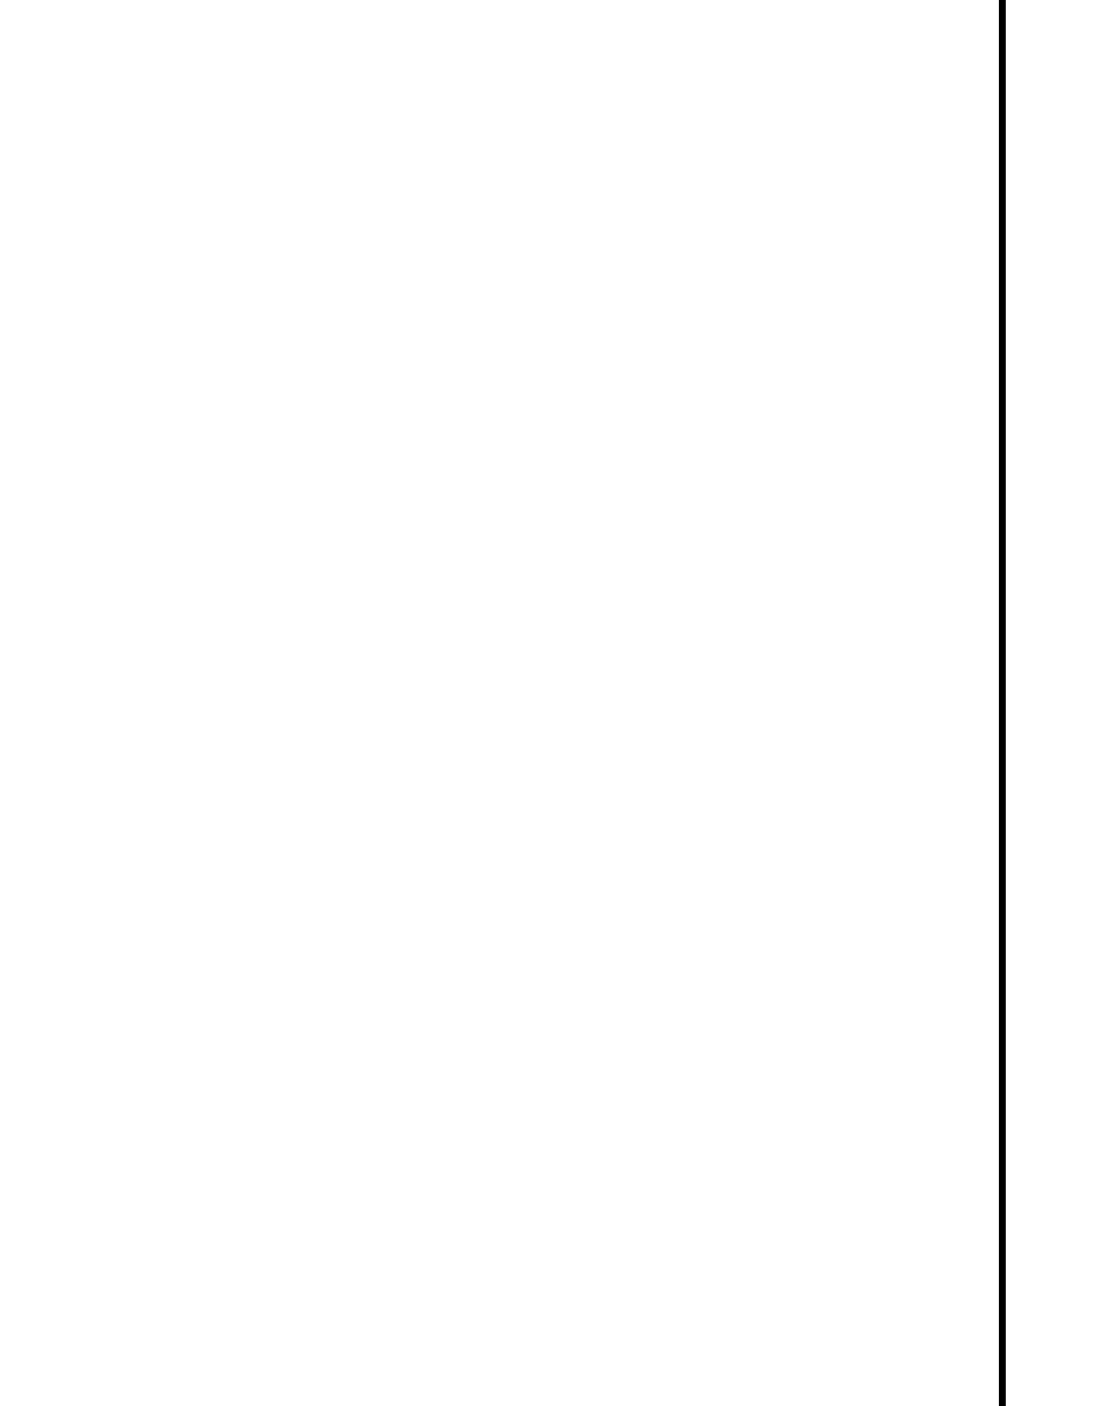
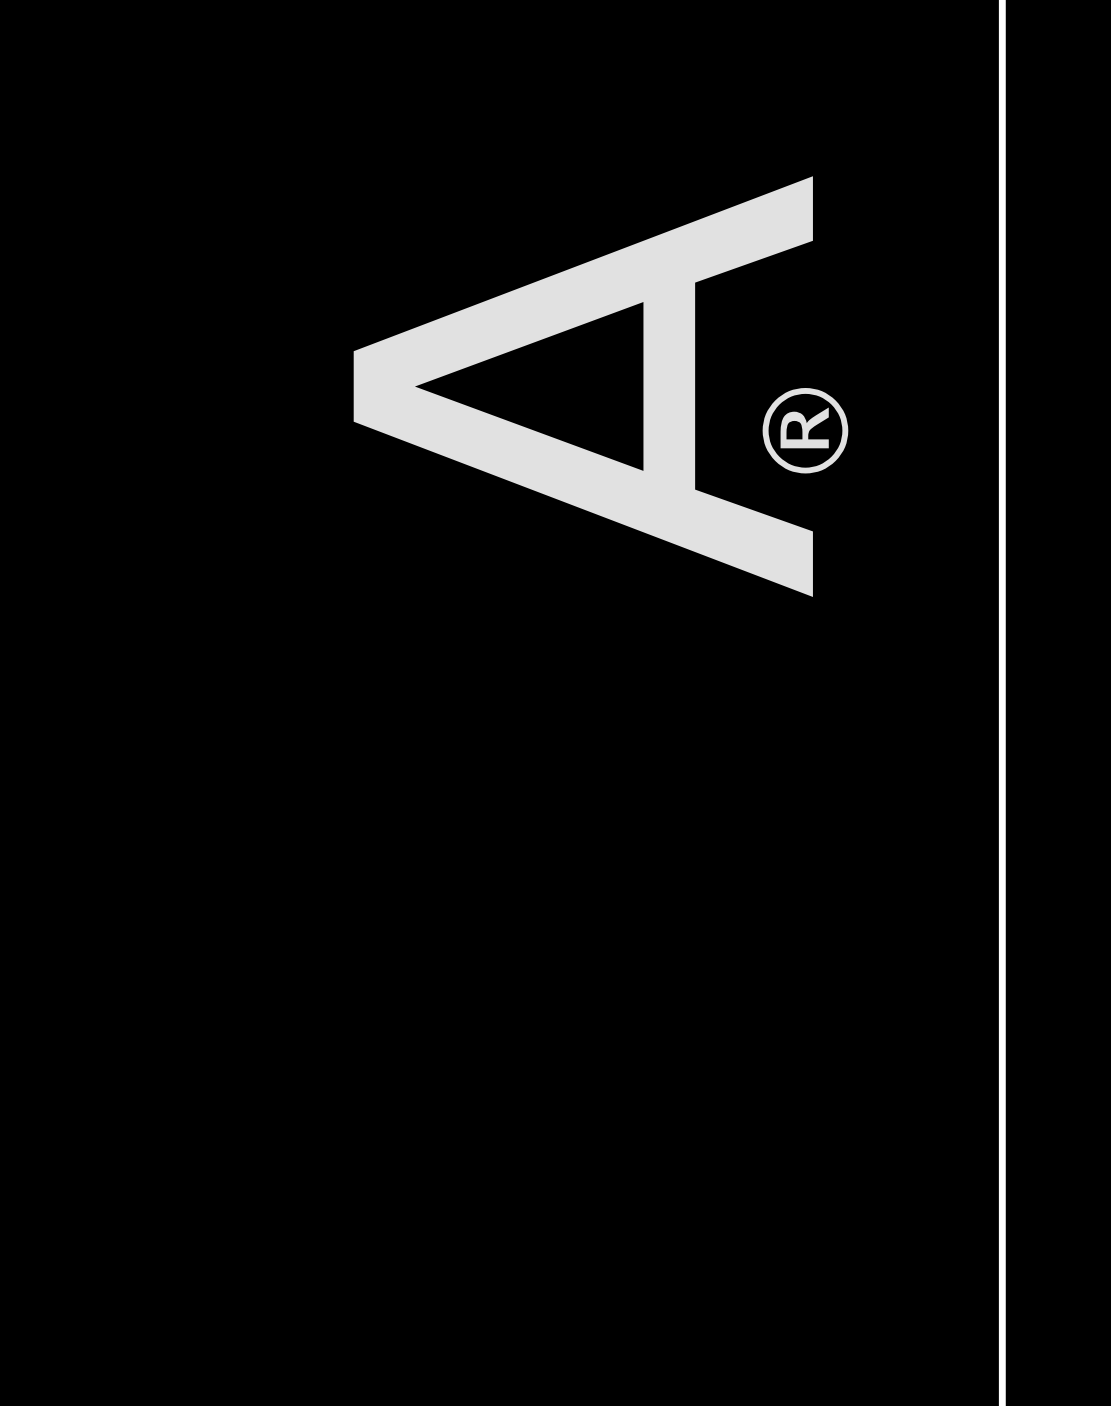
text: none -> A (583, 386)
text: none -> ® (805, 430)

